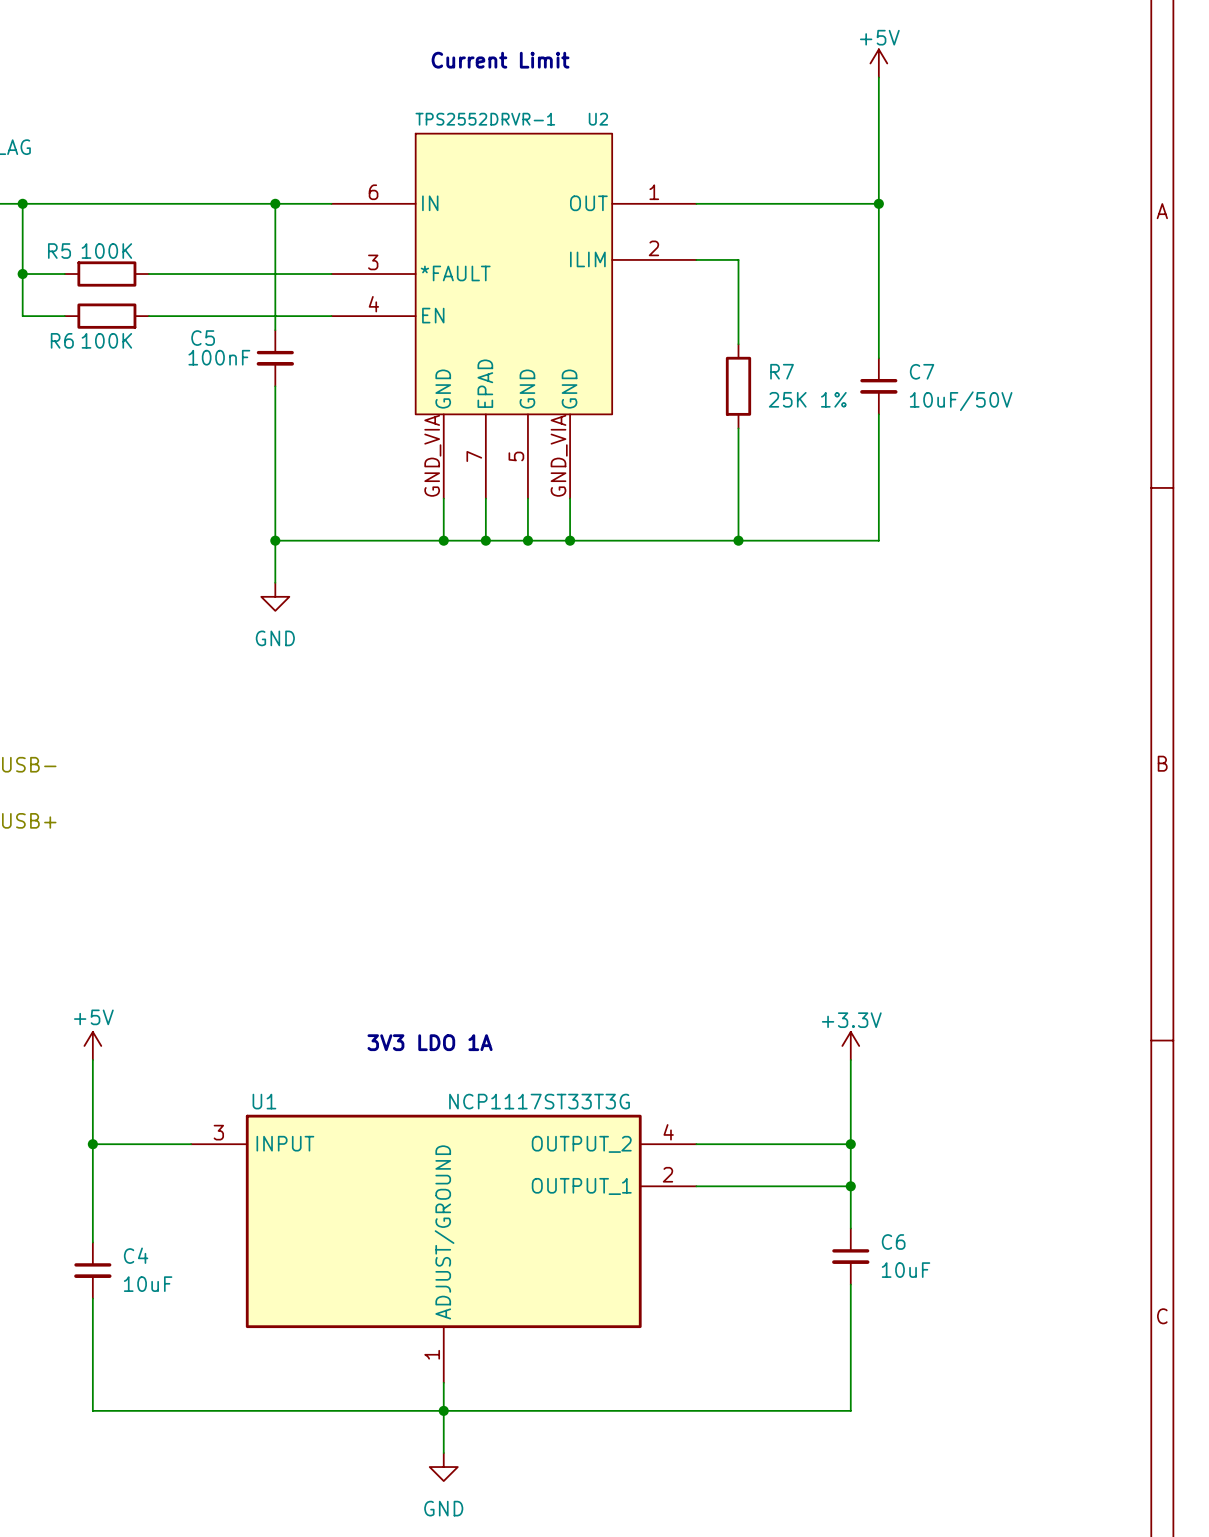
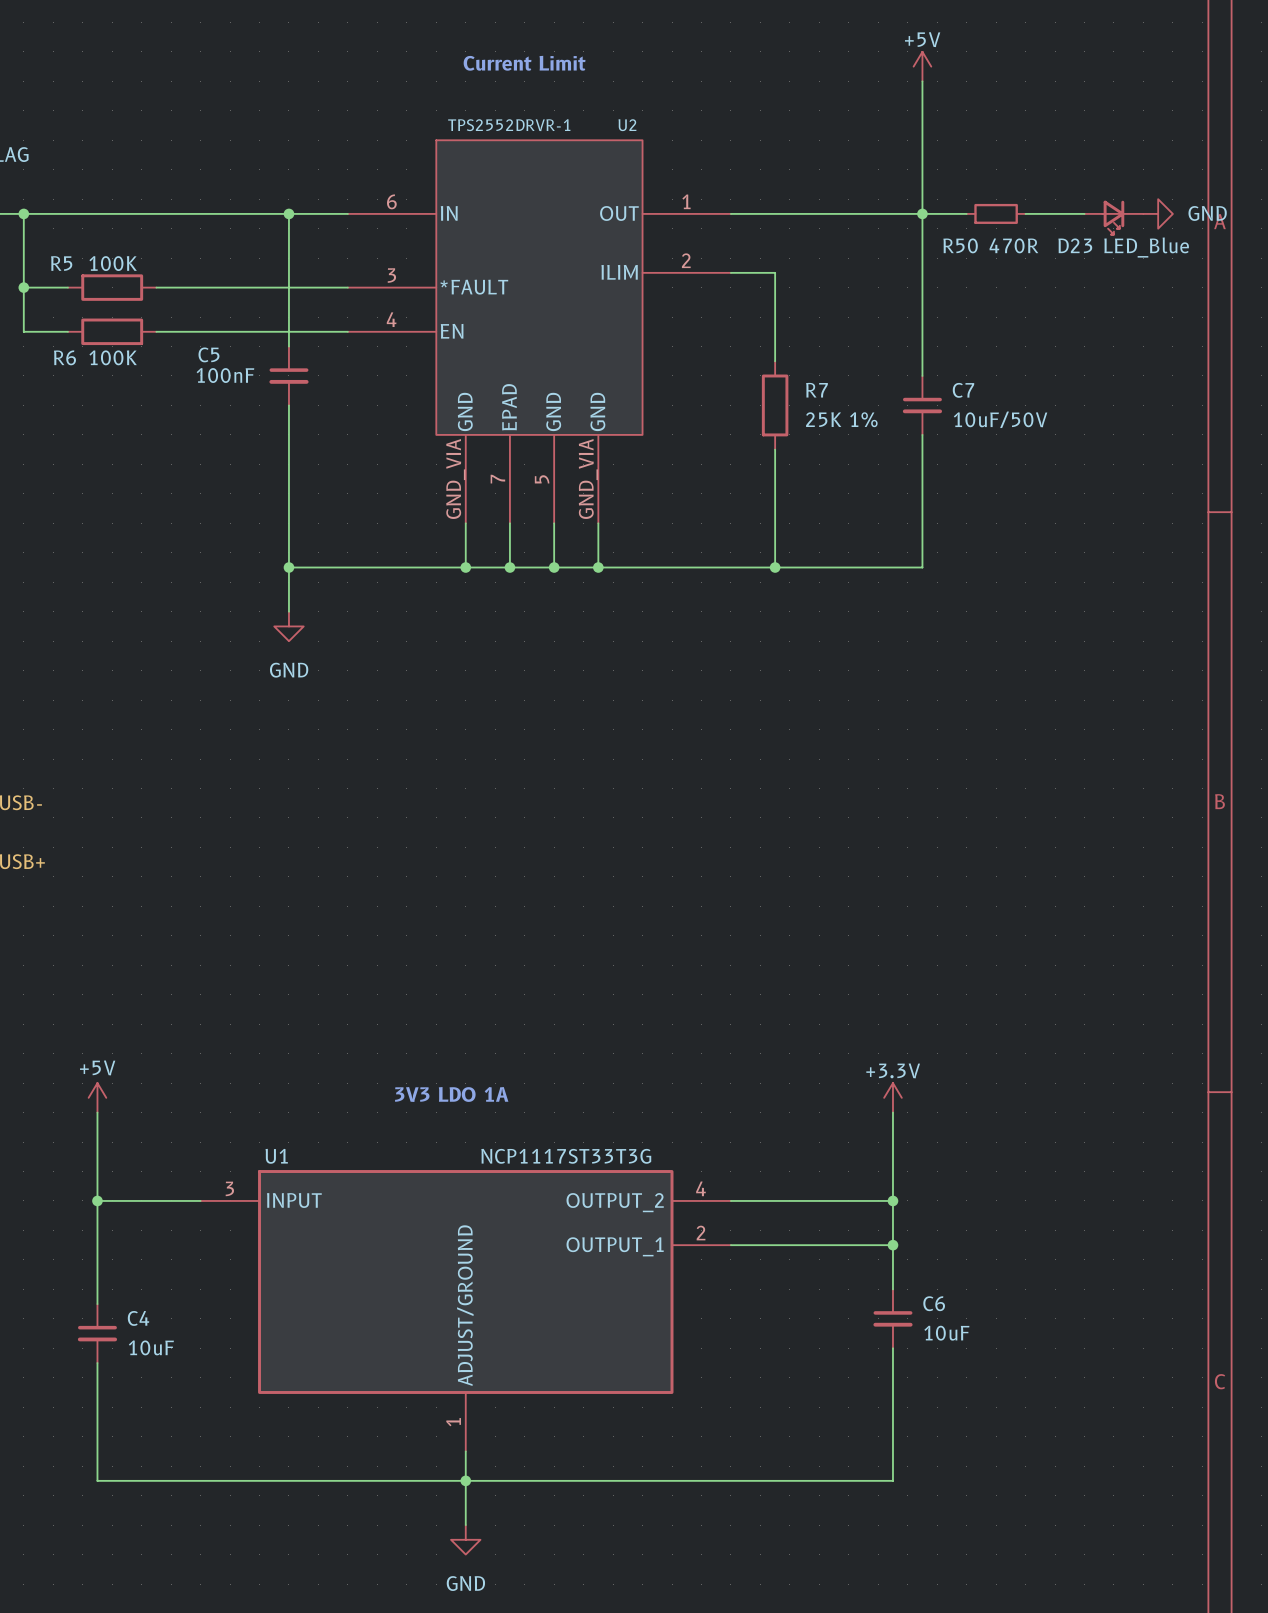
wire: none -> (922, 213) (966, 213)
R50: none -> 470R (996, 213)
wire: none -> (1025, 213) (1084, 213)
power symbol: none -> GND (1158, 213)
D23: none -> LED_Blue (1113, 217)

